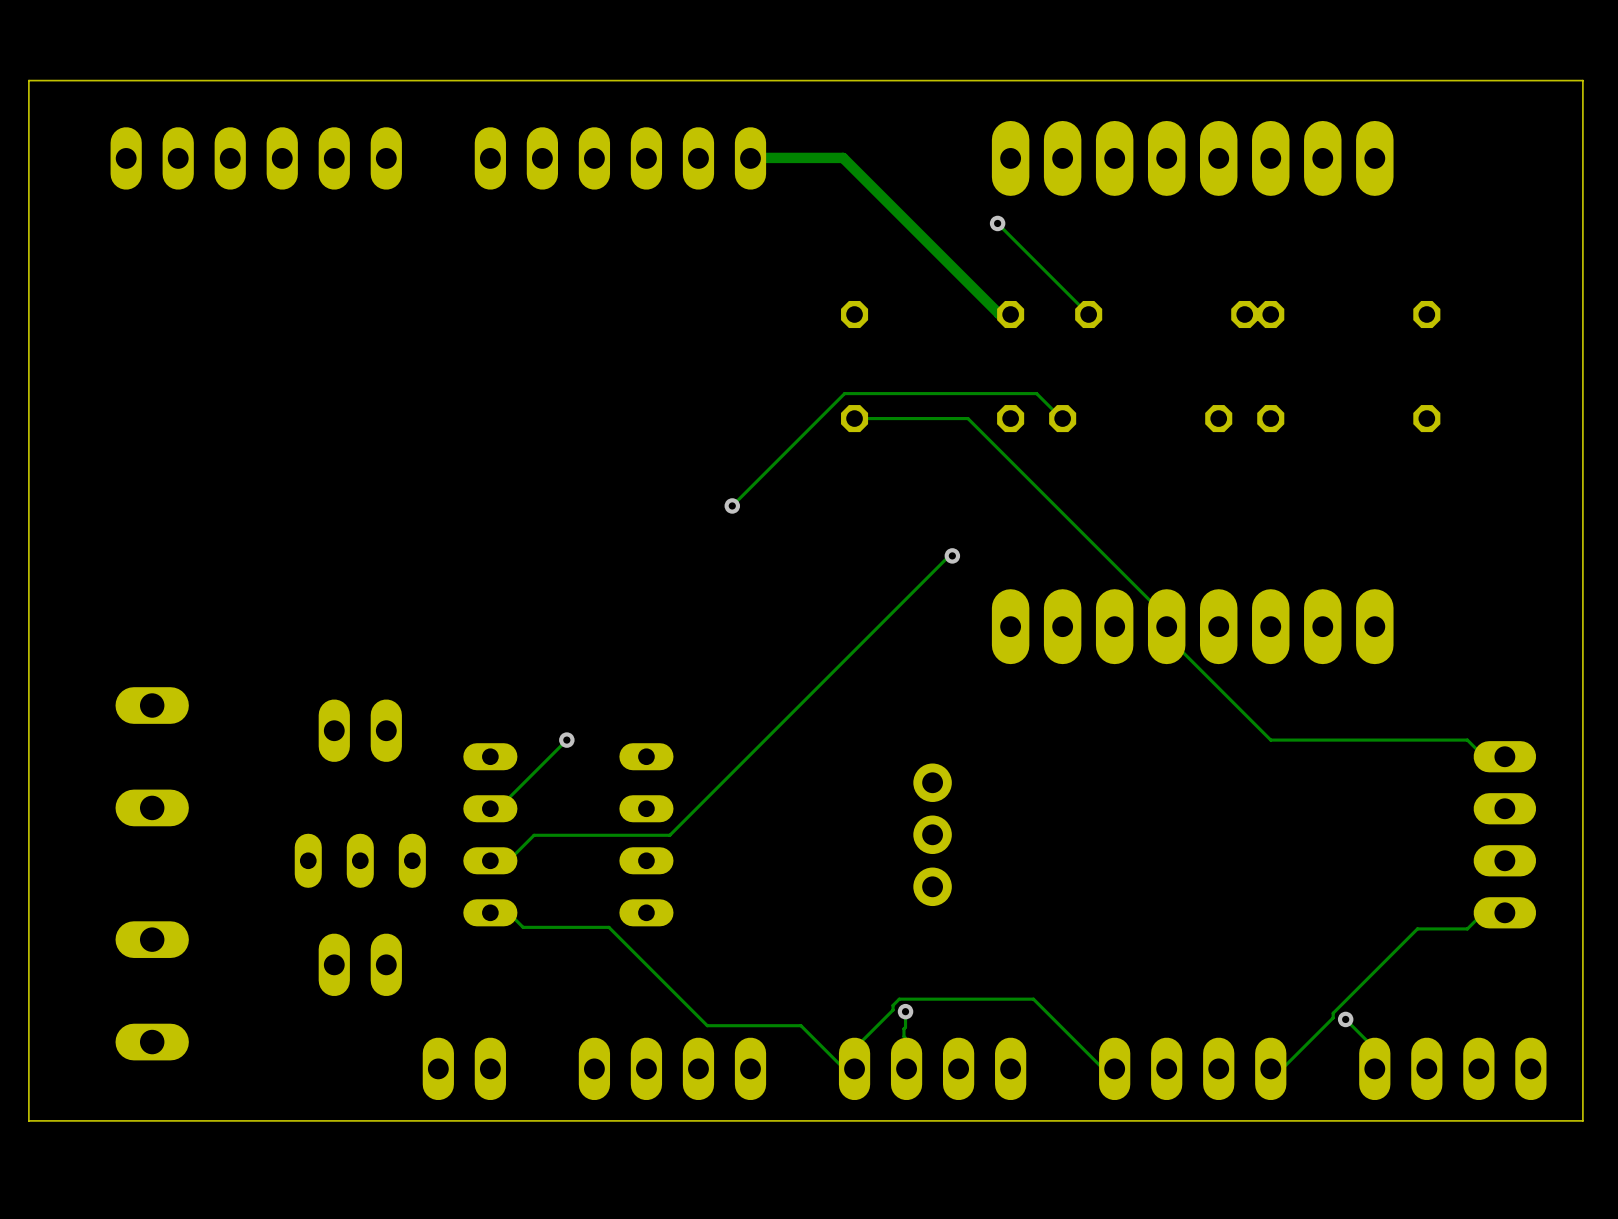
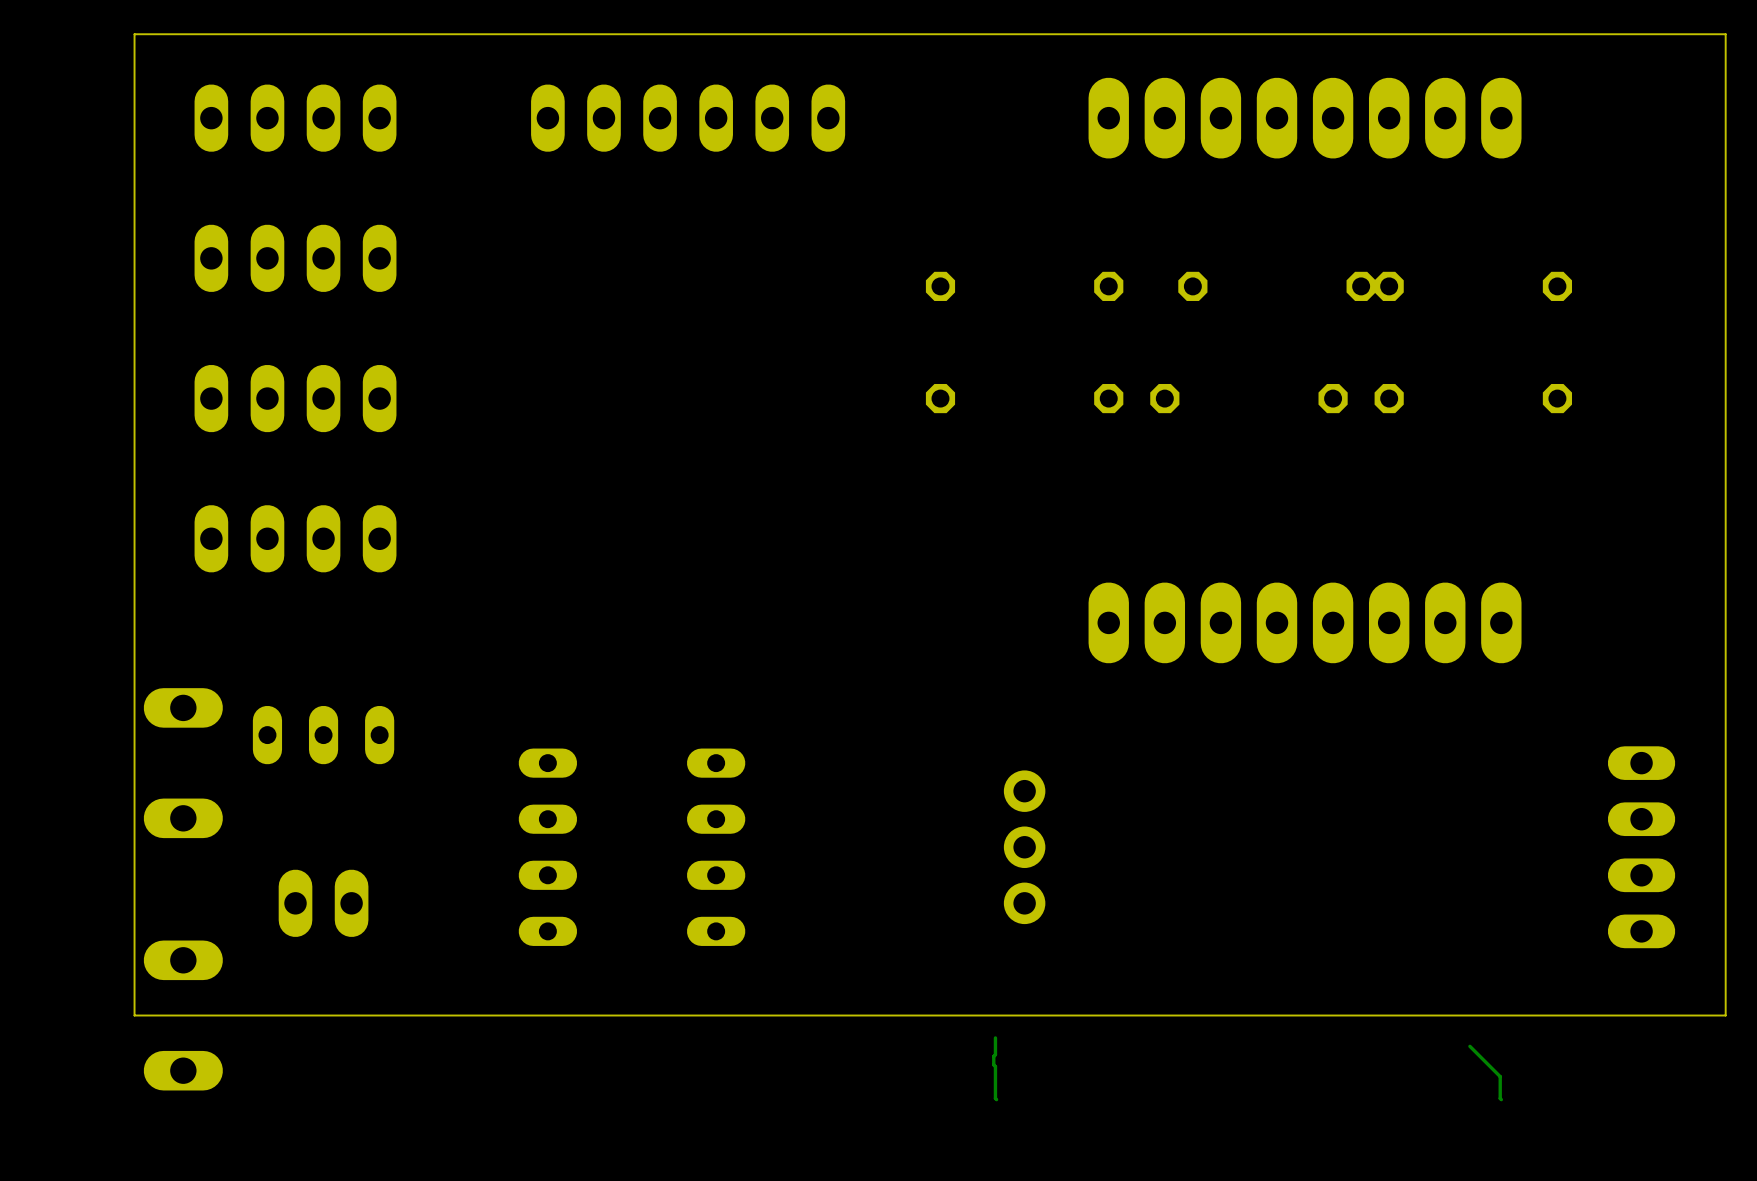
board edge: (106, 80) (28, 80) (28, 1120) (1582, 1120) (1582, 990) -> (134, 34) (134, 1015) (1725, 1015)
part footprint: [110, 127, 402, 190] -> [194, 84, 397, 152]
track: (750, 158) (843, 157) (999, 313) (1010, 314) -> none
track: (997, 223) (1088, 314) -> none
via: (997, 223) -> none
part: none -> (295, 258)
part: none -> (295, 398)
track: (854, 418) (967, 418) (1166, 616) (1167, 637) (1270, 740) (1467, 740) (1483, 755) (1504, 756) -> none
track: (1062, 418) (1036, 393) (844, 393) (732, 505) -> none
via: (732, 505) -> none
part: none -> (295, 538)
track: (952, 555) (949, 555) (669, 835) (534, 835) (509, 860) (490, 860) -> none
via: (952, 555) -> none
part: (360, 730) -> none
track: (566, 740) (498, 808) (490, 808) -> none
via: (566, 740) -> none
part position: (360, 860) -> (323, 735)
part: none -> (323, 903)
track: (490, 912) (509, 913) (523, 927) (608, 927) (707, 1025) (800, 1025) (843, 1067) (854, 1068) (854, 1049) (893, 1010) (893, 1005) (899, 999) (1033, 999) (1102, 1067) (1114, 1068) -> none
track: (1504, 912) (1483, 913) (1467, 928) (1417, 928) (1333, 1013) (1333, 1017) (1283, 1067) (1270, 1068) -> none
part: (360, 964) -> none
via: (905, 1011) -> none
via: (1345, 1019) -> none
part: (464, 1068) -> none
part: (672, 1068) -> none
part: (932, 1068) -> none
part: (1192, 1068) -> none
part: (1452, 1068) -> none

